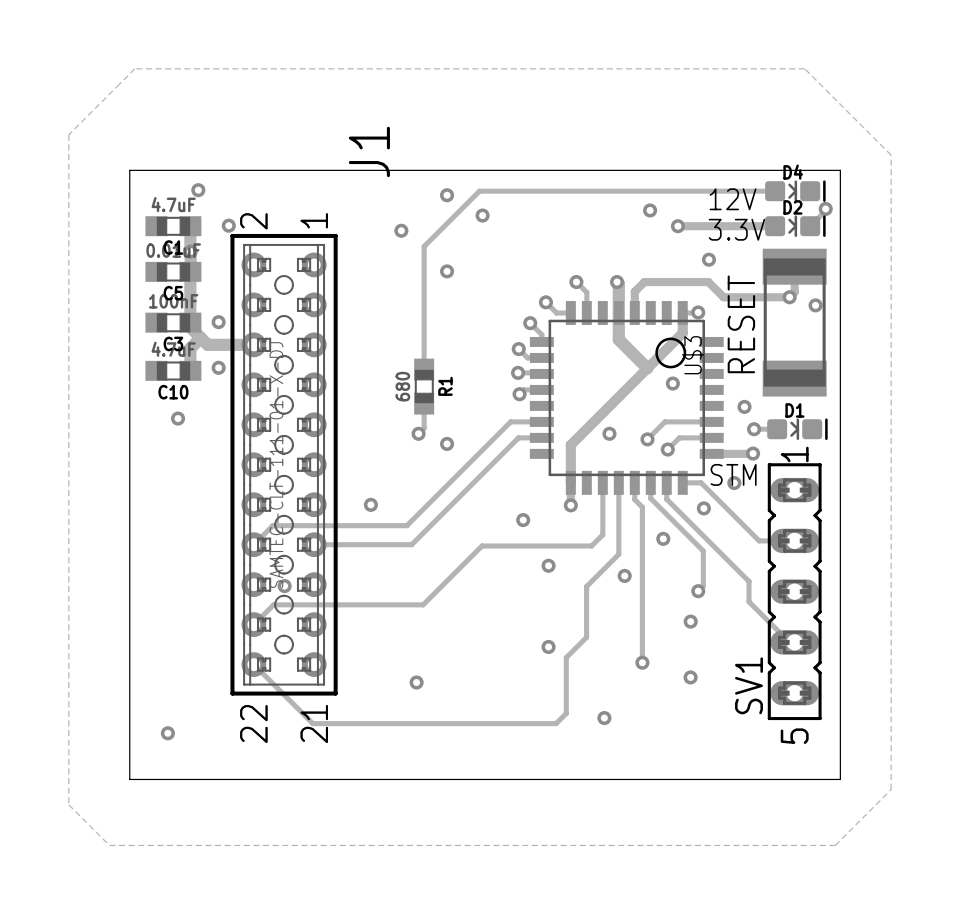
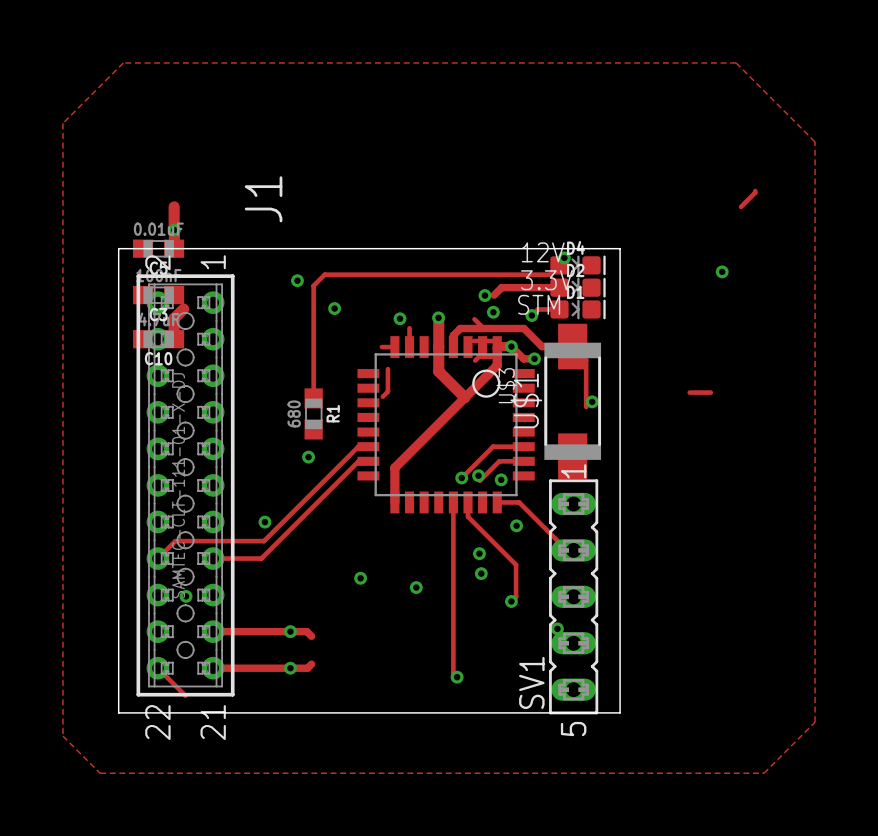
via: (198, 190) -> none
track: (775, 191) (479, 191) (424, 246) (424, 369) -> none
D4 position: (795, 191) -> (578, 265)
via: (447, 195) -> none
text position: 12V (733, 199) -> 12V (543, 252)
via: (825, 208) -> none
via: (650, 210) -> none
via: (482, 215) -> none
via: (228, 225) -> none
C1: 4.7uF (173, 226) -> none
track: (677, 226) (775, 226) -> none
via: (677, 226) -> none
D2 position: (795, 226) -> (578, 287)
text position: 3.3V (736, 229) -> 3.3V (546, 280)
via: (401, 230) -> none
via: (708, 259) -> none
track: (794, 266) (794, 292) (789, 297) (723, 297) (708, 282) (644, 282) (634, 291) (634, 313) -> none
board edge: (129, 271) (129, 170) (840, 170) (840, 779) (677, 779) -> (118, 248) (620, 248) (620, 712)
track: (190, 271) (190, 327) (207, 344) (253, 344) -> none
via: (447, 271) -> none
track: (576, 282) (586, 292) (586, 313) -> none
via: (576, 282) -> none
track: (617, 282) (618, 283) (618, 339) (647, 368) -> none
track: none -> (559, 265) (550, 274) (324, 274) (313, 285) (313, 398)
track: (545, 302) (556, 313) (570, 313) -> none
via: (545, 302) -> none
via: (815, 305) -> none
via: none -> (297, 280)
track: (698, 312) (682, 313) (682, 333) (570, 444) (570, 505) -> none
via: (698, 312) -> none
track: none -> (559, 287) (501, 287) (494, 295)
via: (218, 322) -> none
RESET: (794, 322) -> none
track: (530, 323) (541, 334) (541, 341) -> none
via: none -> (334, 308)
track: none -> (559, 309) (537, 309) (531, 315)
via: none -> (493, 312)
via: none -> (531, 315)
track: none -> (438, 318) (438, 371) (465, 397)
via: none -> (438, 317)
via: none -> (400, 318)
via: (518, 349) -> none
track: none -> (409, 328) (409, 347)
via: (218, 367) -> none
via: (518, 372) -> none
via: none -> (511, 346)
track: none -> (381, 347) (394, 347)
track: none -> (453, 347) (453, 335) (460, 328) (523, 328) (542, 346) (572, 346) (586, 360) (586, 406)
via: (672, 383) -> none
R1 position: (424, 386) -> (313, 413)
track: none -> (534, 358) (523, 358) (511, 346) (497, 347) (497, 365) (394, 467) (394, 502)
via: none -> (534, 358)
via: (519, 394) -> none
U$3 position: (626, 397) -> (446, 424)
via: (744, 406) -> none
via: (178, 418) -> none
track: (541, 421) (510, 421) (406, 525) (272, 525) (253, 544) -> none
track: (711, 421) (664, 421) (647, 439) -> none
via: (754, 429) -> none
D1 position: (797, 429) -> (578, 309)
via: (418, 433) -> none
via: (609, 433) -> none
track: (541, 437) (518, 437) (411, 544) (314, 544) -> none
track: (711, 437) (679, 437) (667, 449) -> none
U$1: none -> (572, 401)
via: (447, 443) -> none
via: (667, 449) -> none
track: (753, 453) (711, 453) -> none
via: (753, 453) -> none
J1 position: (284, 464) -> (185, 485)
text position: STM (733, 474) -> STM (539, 304)
track: (602, 482) (602, 534) (591, 545) (482, 545) (423, 604) (273, 604) (253, 624) -> none
track: (618, 482) (618, 554) (586, 586) (586, 637) (566, 657) (566, 713) (556, 723) (312, 723) (253, 664) -> none
track: (634, 482) (634, 499) (642, 507) (642, 662) -> none
track: (650, 482) (650, 498) (703, 551) (703, 586) (698, 591) -> (468, 502) (468, 516) (516, 564) (516, 596) (511, 601)
track: (666, 482) (666, 499) (749, 581) (749, 601) (789, 642) (794, 642) -> none
track: (682, 482) (701, 482) (759, 540) (794, 540) -> none
via: (734, 483) -> none
track: none -> (368, 446) (358, 446) (263, 541) (175, 541) (157, 558)
track: none -> (523, 446) (493, 446) (461, 478)
via position: (370, 504) -> (308, 457)
track: none -> (368, 461) (358, 461) (261, 558) (213, 558)
track: none -> (523, 461) (499, 461) (479, 480)
via: (570, 505) -> none
via: (703, 508) -> none
via: none -> (461, 478)
via: none -> (501, 479)
via: (663, 538) -> none
track: none -> (453, 502) (453, 673) (457, 677)
track: none -> (497, 502) (519, 502) (567, 550) (573, 550)
via position: (548, 565) -> (516, 525)
via: (624, 575) -> none
via position: (284, 586) -> (264, 522)
via: (698, 591) -> none
SV1 position: (794, 591) -> (573, 596)
via: none -> (479, 553)
via: (690, 621) -> none
via: none -> (481, 573)
via: none -> (360, 578)
via: none -> (416, 587)
via position: (548, 646) -> (511, 601)
via: none -> (186, 596)
via: (642, 662) -> none
via: (690, 677) -> none
via: (416, 682) -> none
via: none -> (557, 628)
track: none -> (213, 631) (306, 631) (311, 636)
via: none -> (290, 631)
via: (604, 718) -> none
track: none -> (311, 664) (307, 668) (213, 668)
track: none -> (157, 668) (185, 695)
via: none -> (290, 668)
via: (167, 733) -> none
via: none -> (457, 677)

